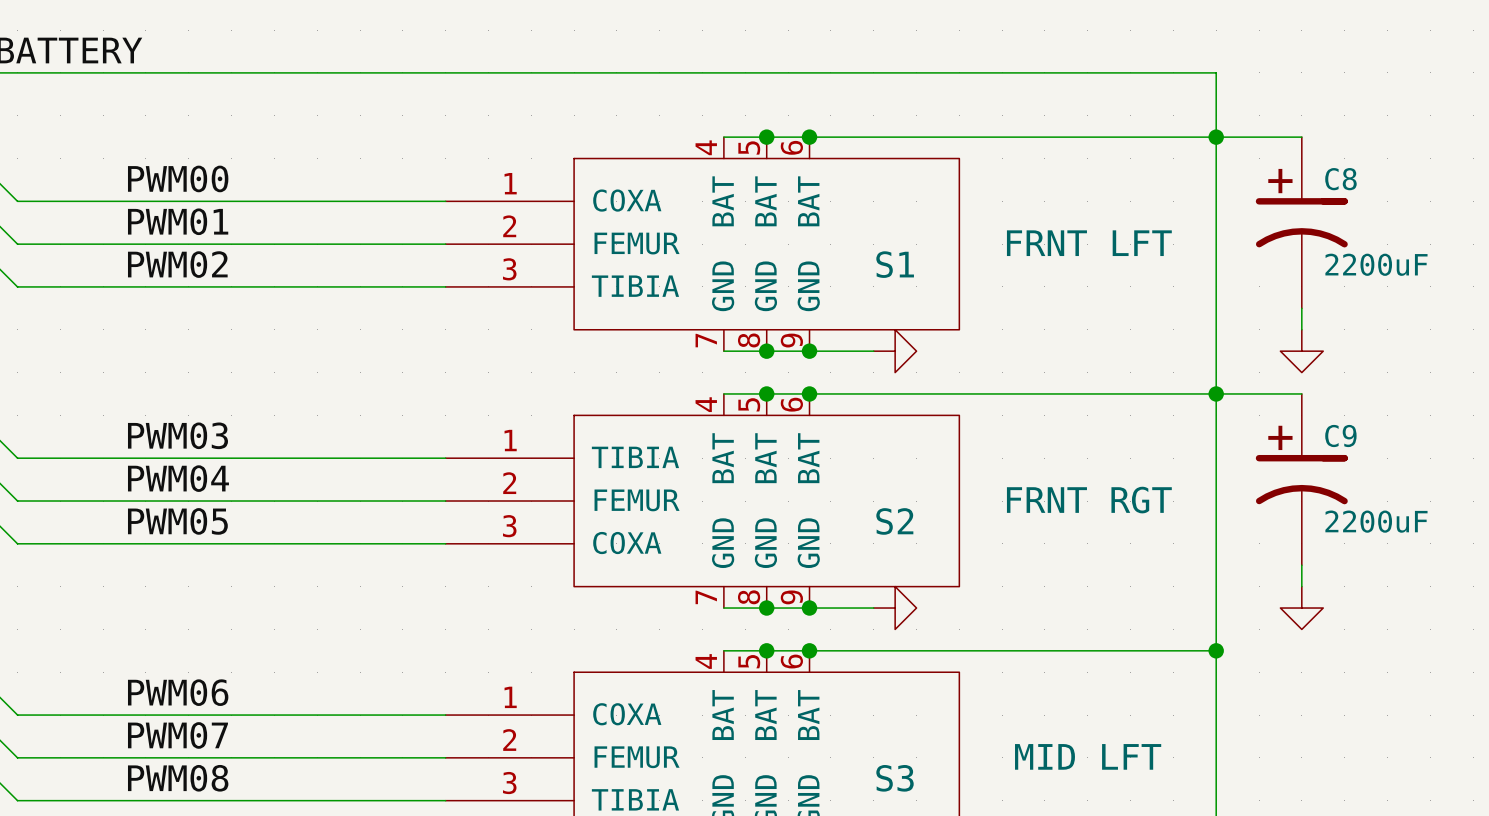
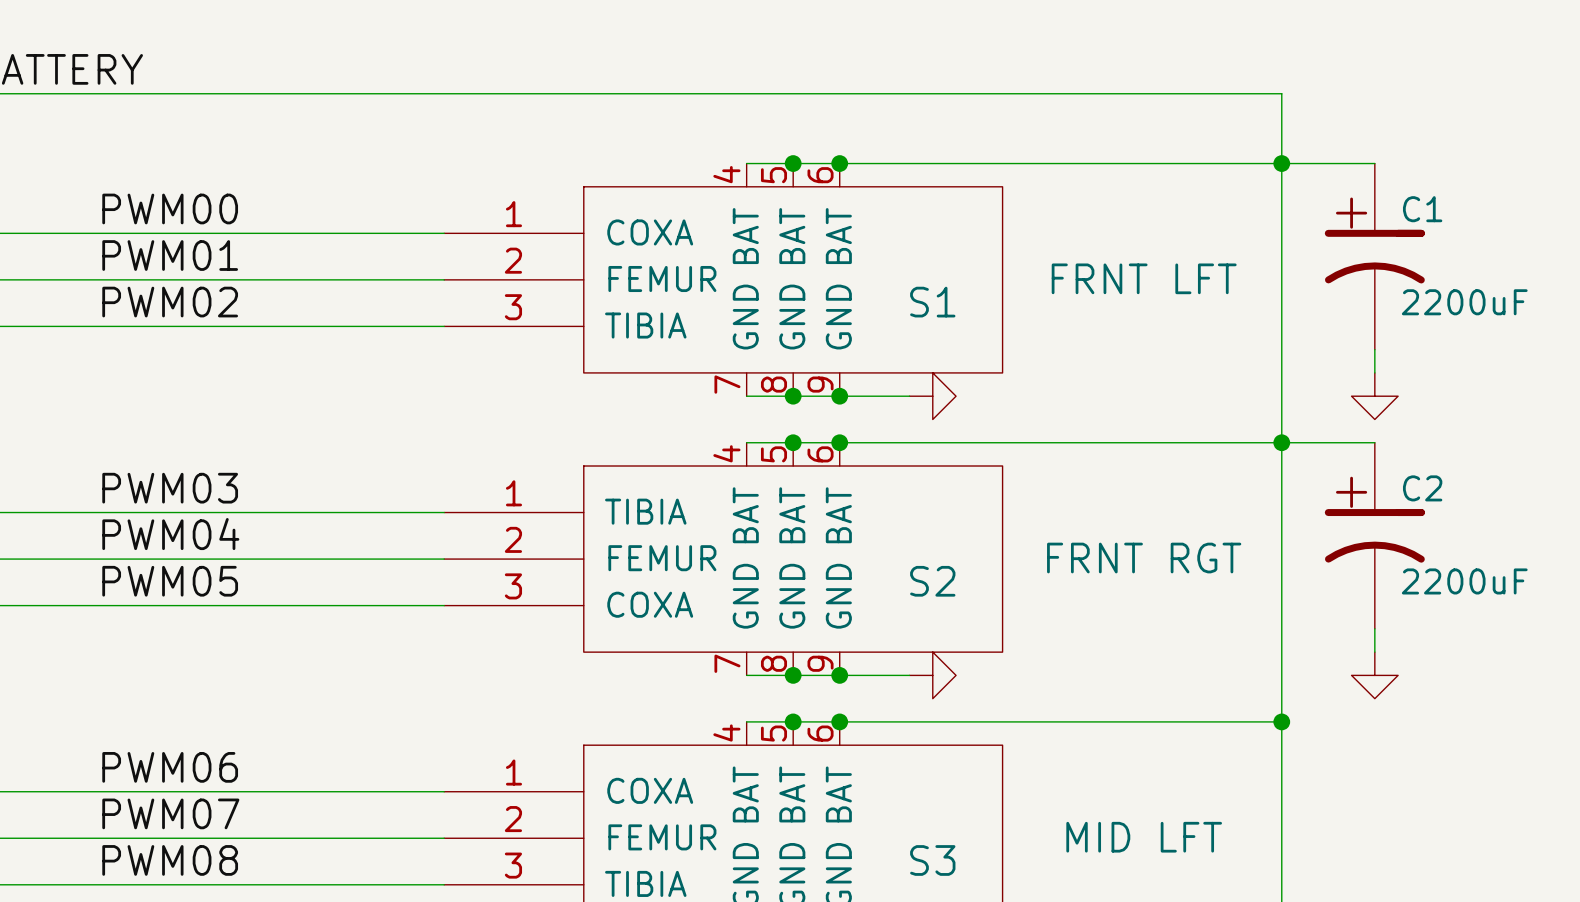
C8 name: C8 (1340, 179) -> C1 (1422, 209)
C9 name: C9 (1340, 436) -> C2 (1422, 488)

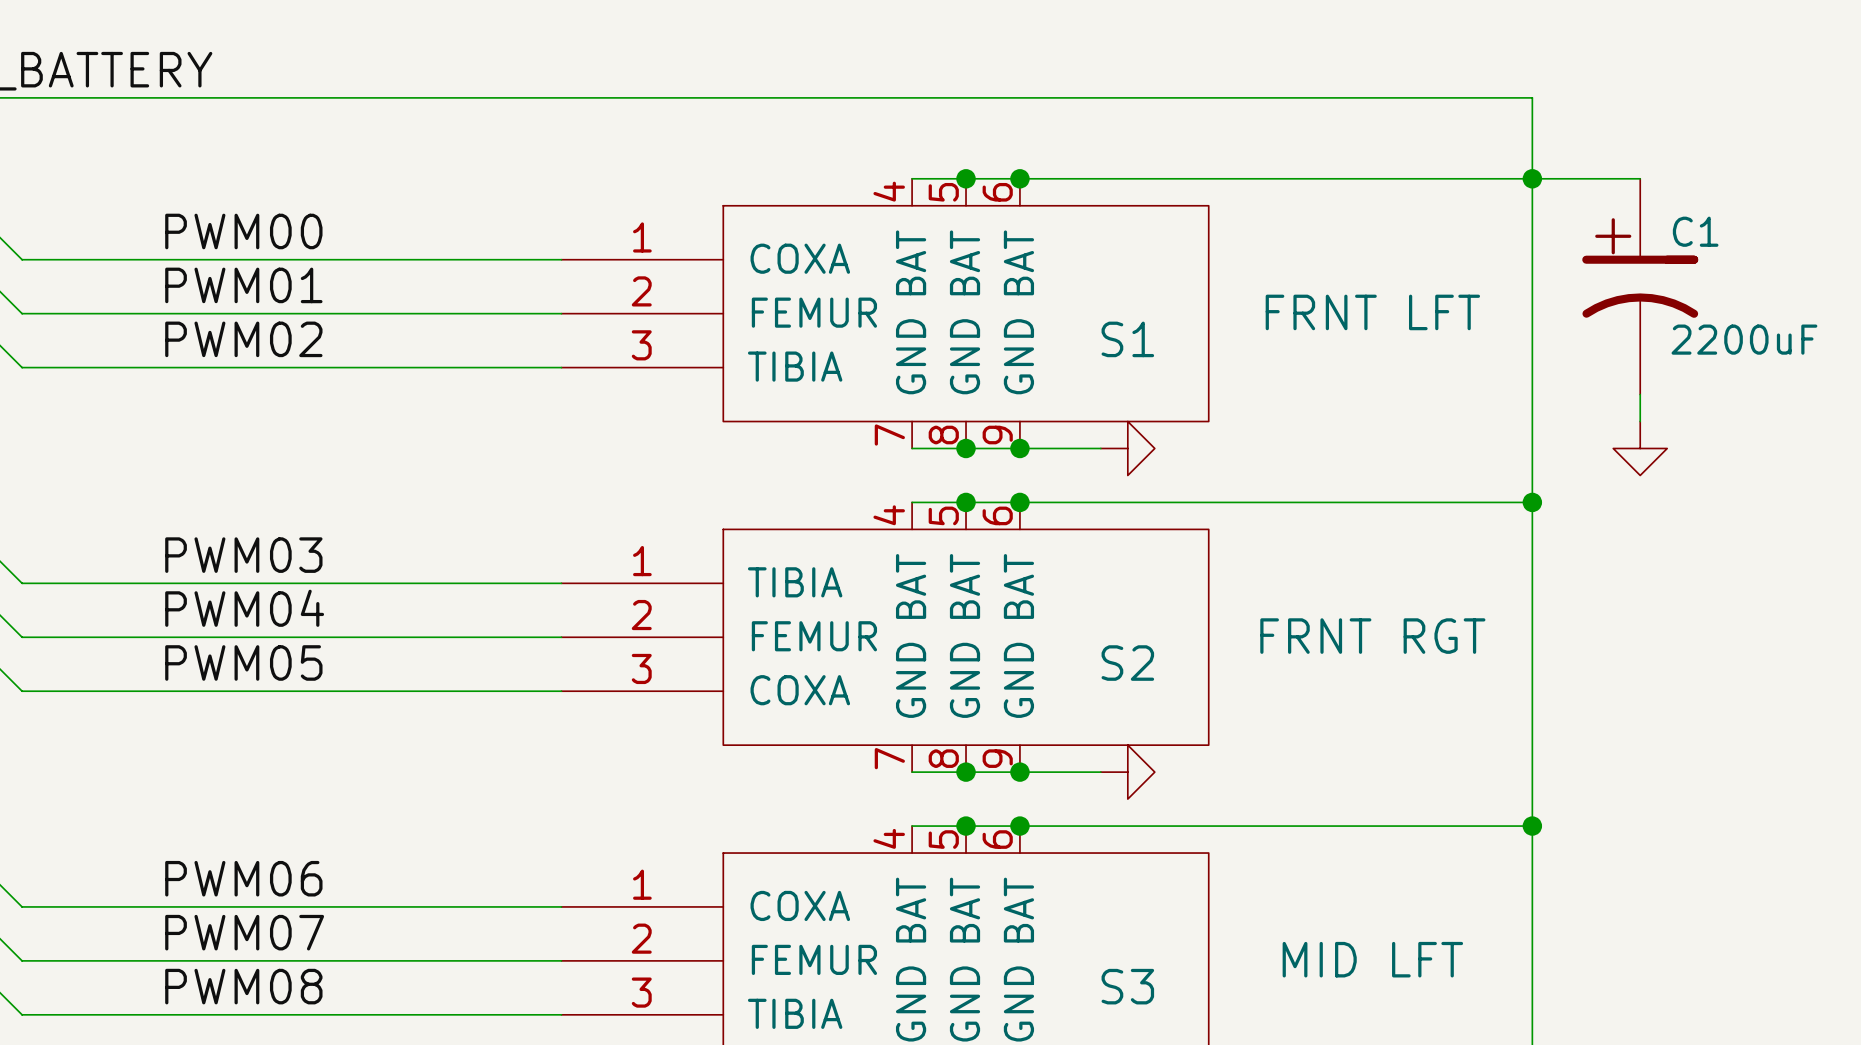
wire: (1281, 442) (1374, 442) -> none
C2: 2200uF (1374, 535) -> none
wire: (1374, 628) (1374, 652) -> none
power symbol: (1374, 675) -> none

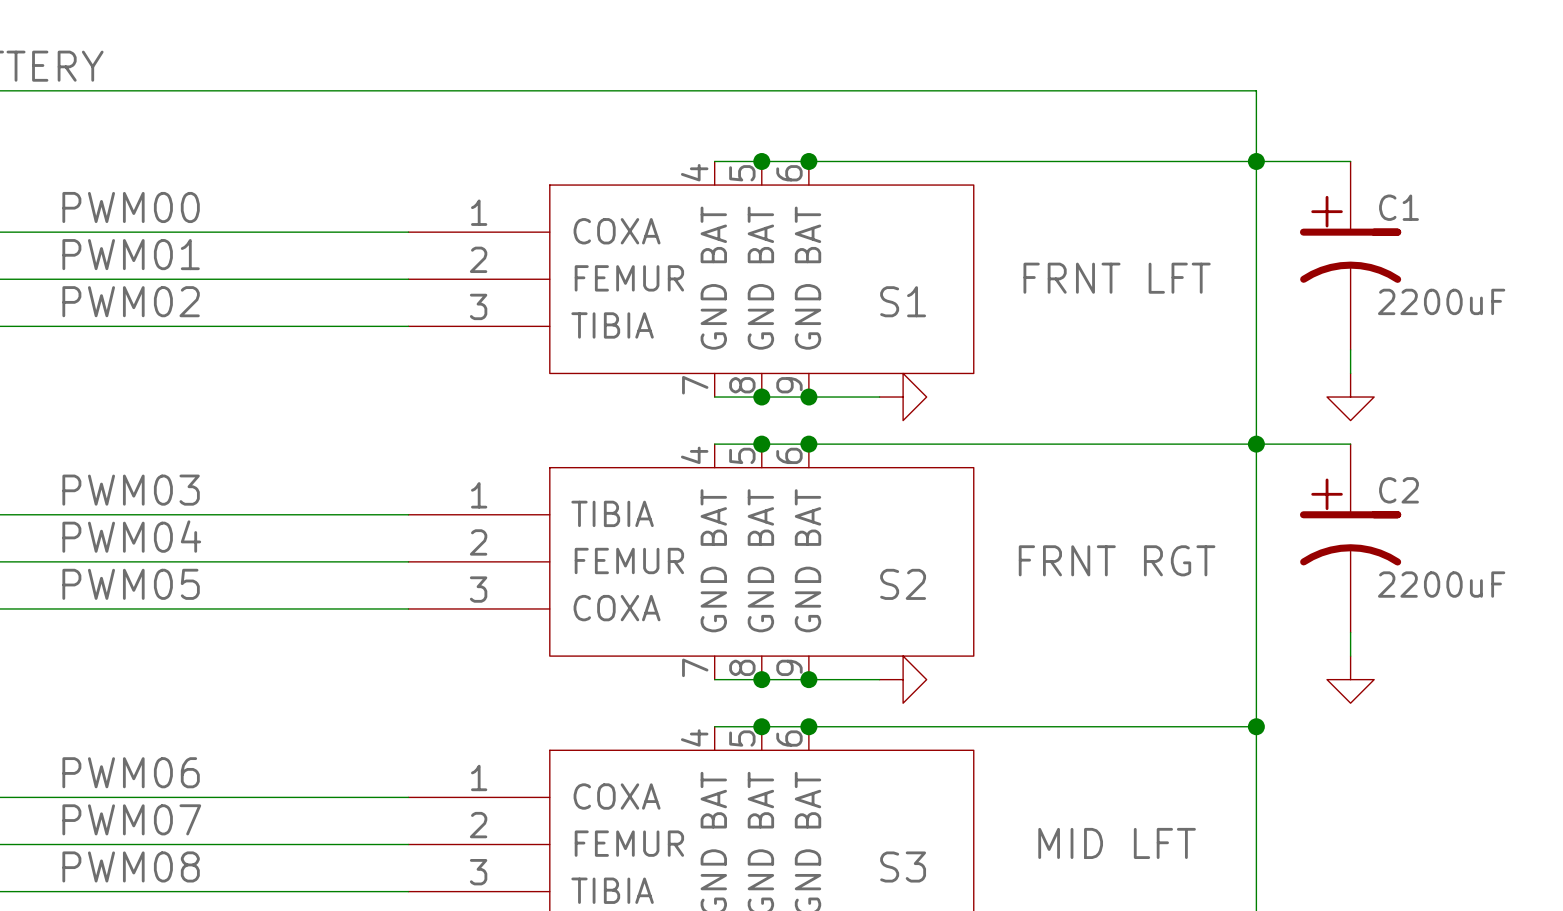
wire: none -> (1256, 444) (1350, 444)
C2: none -> 2200uF (1350, 538)
wire: none -> (1350, 632) (1350, 656)
power symbol: none -> (1350, 679)

